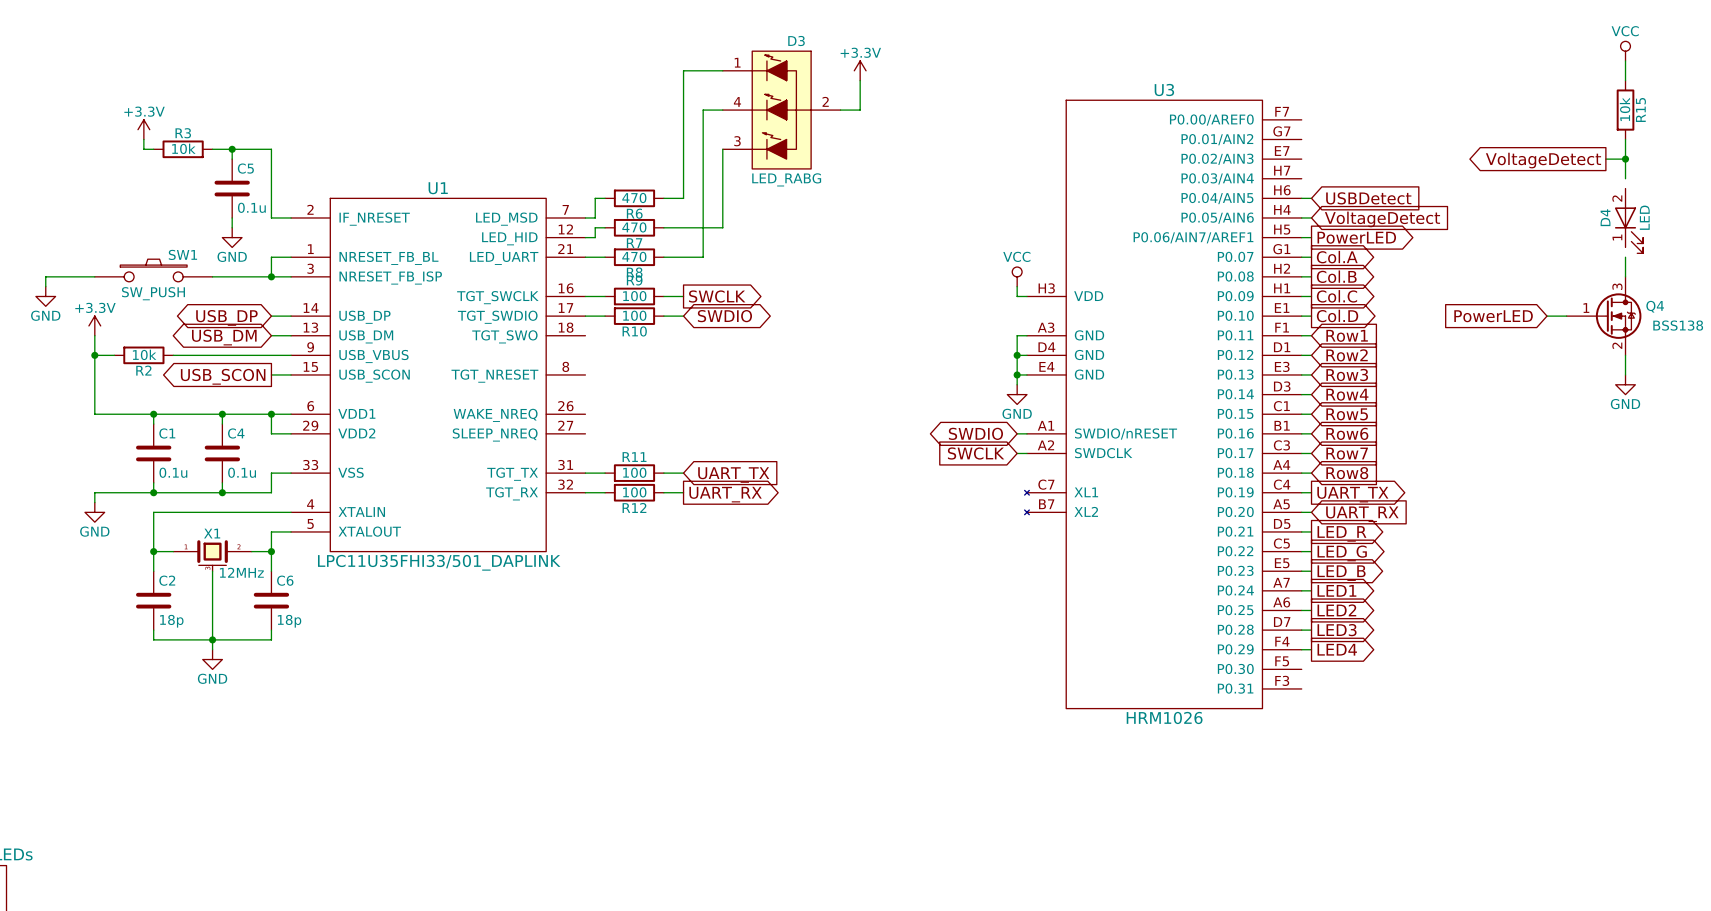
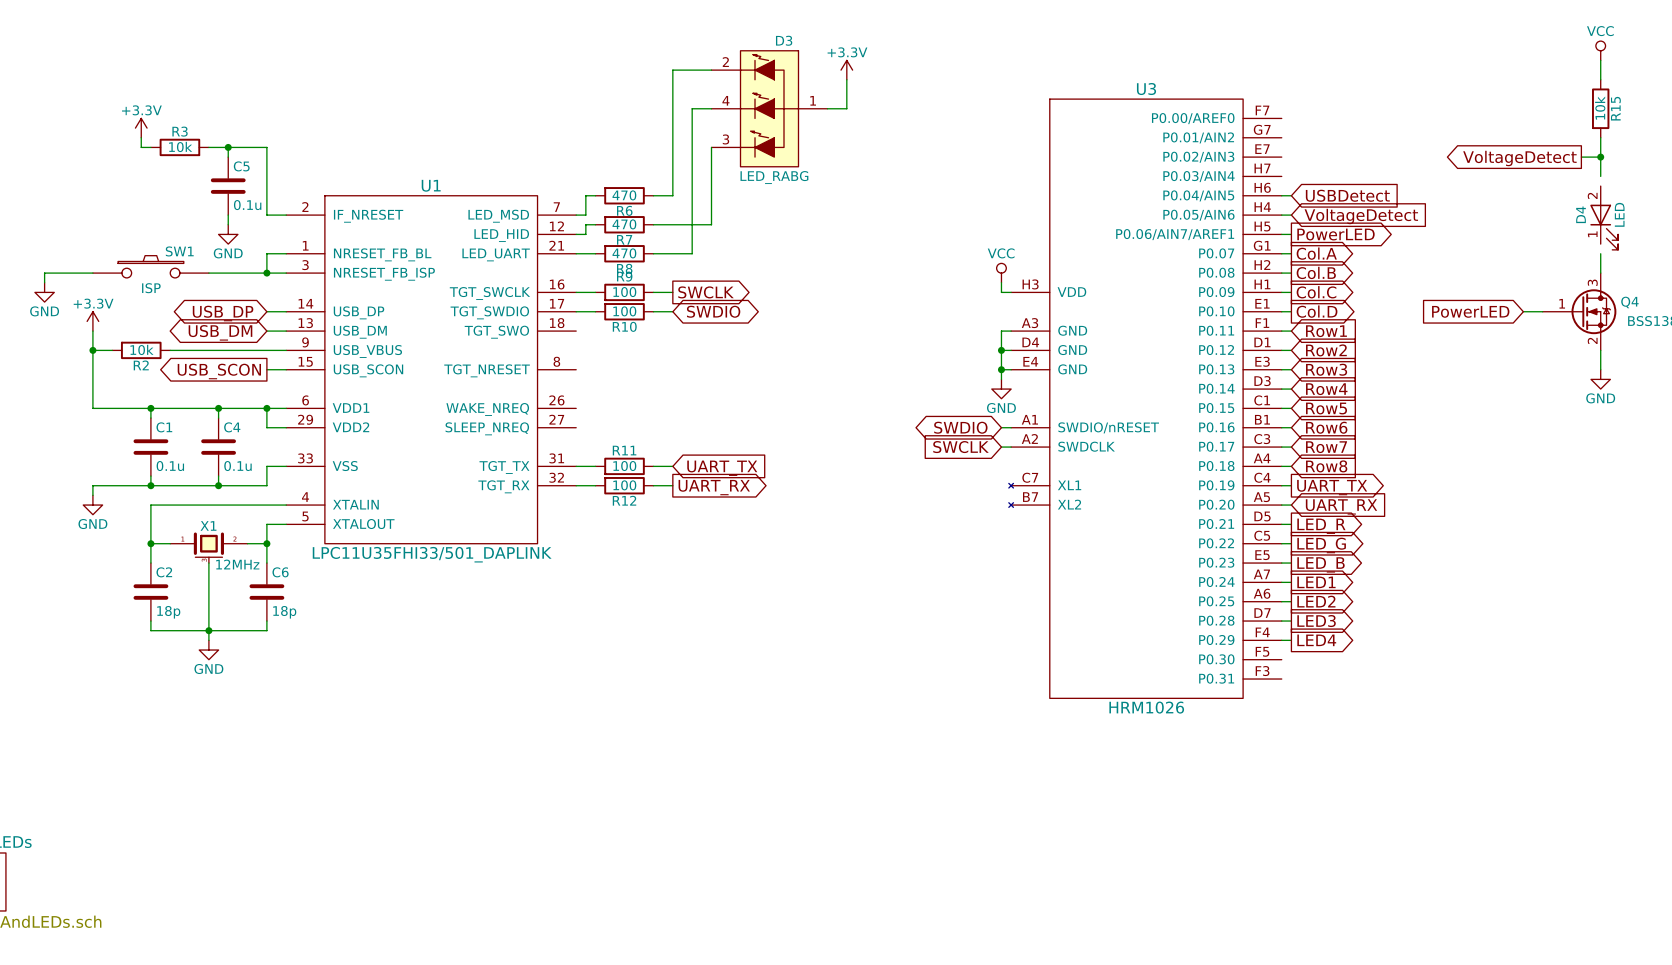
D3 pin number: 1 (737, 62) -> 2 (725, 62)
D3 pin number: 2 (825, 101) -> 1 (813, 100)
SW1 value: SW_PUSH (153, 293) -> ISP (151, 288)

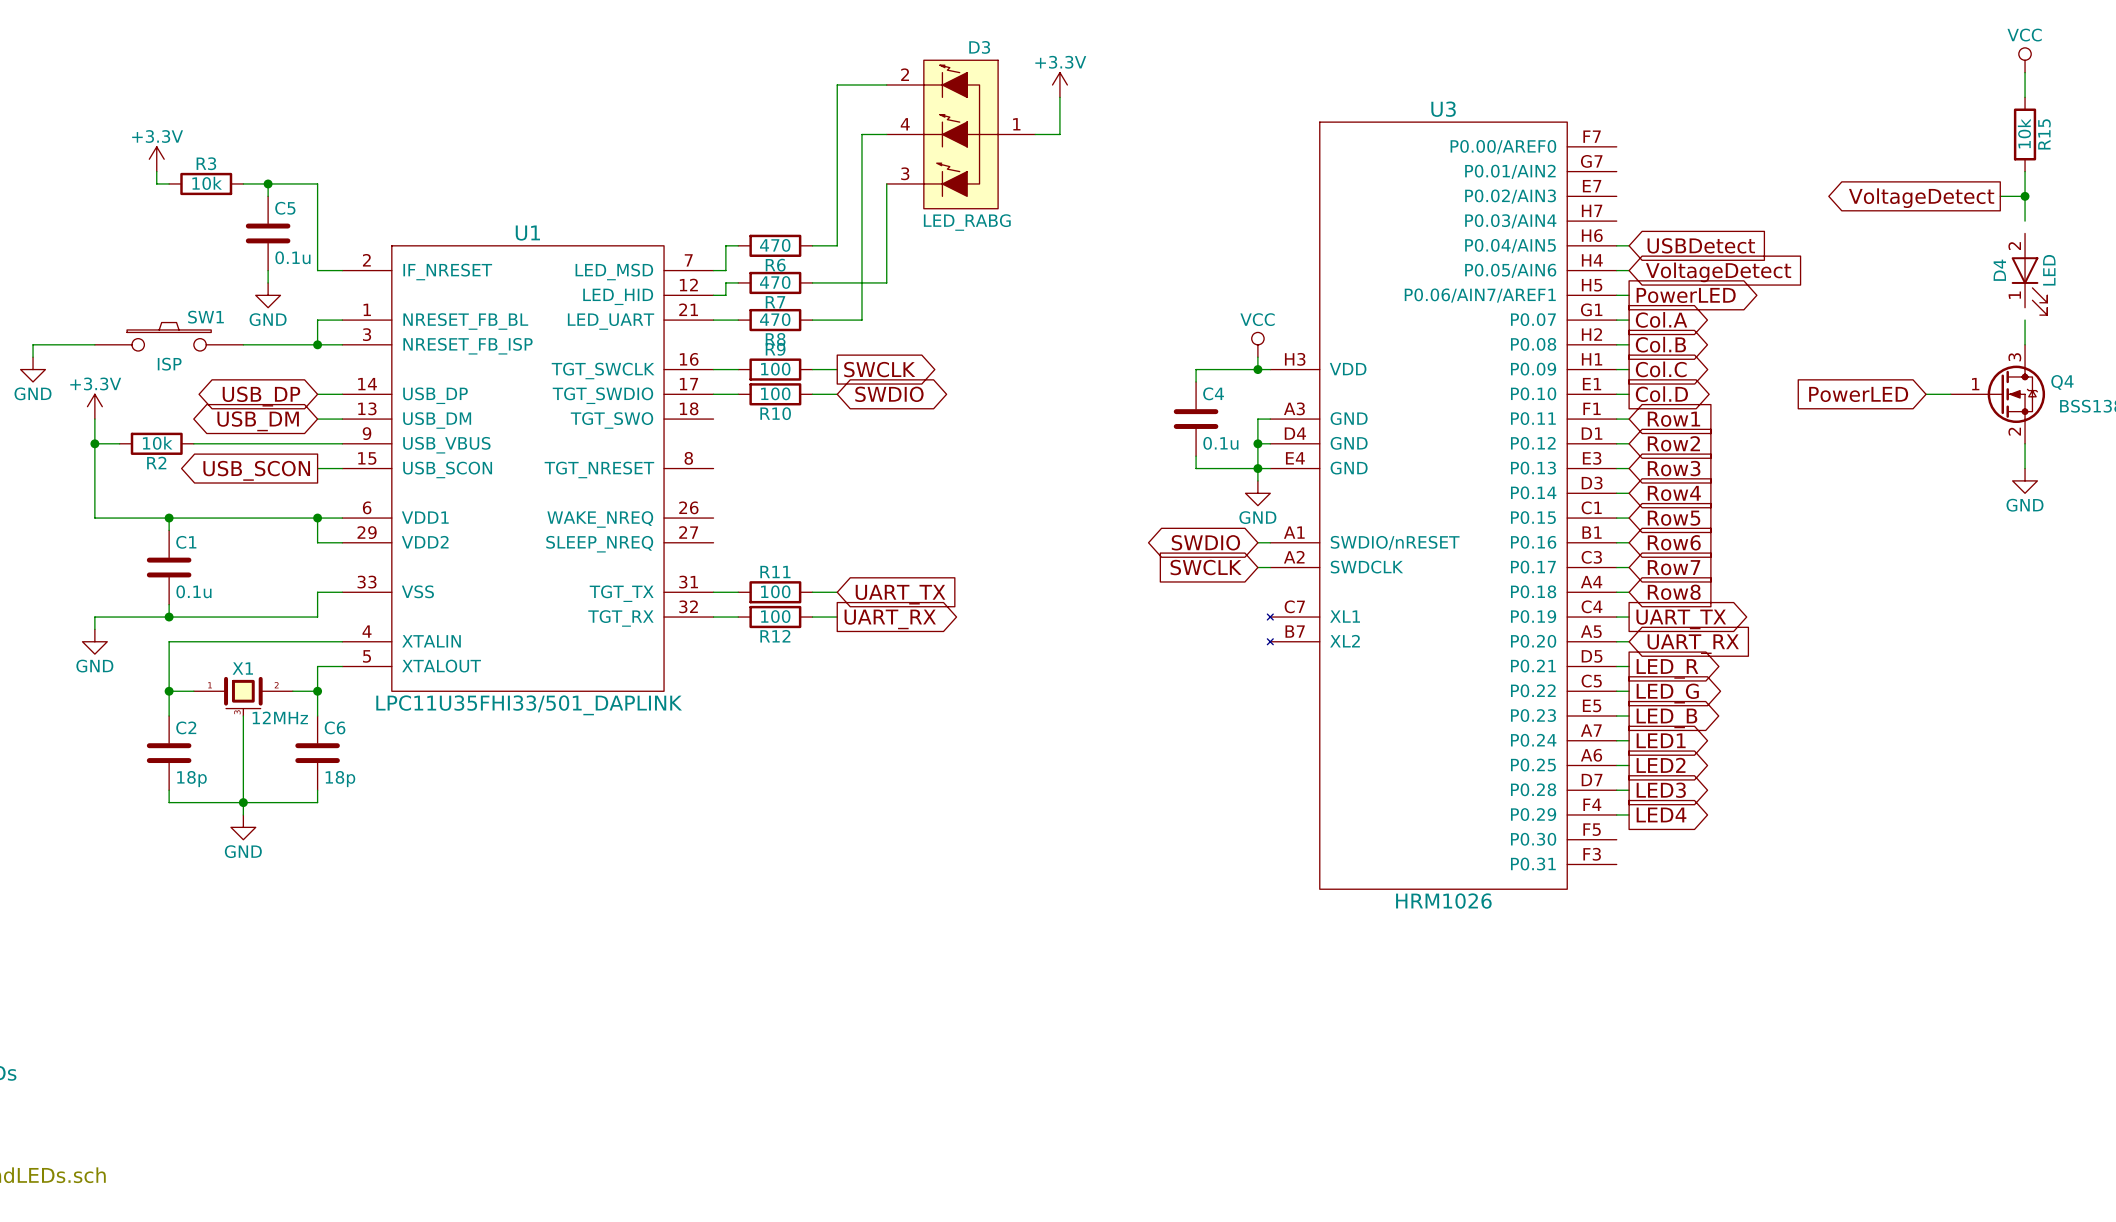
wire: none -> (1257, 369) (1196, 369) (1196, 381)
junction: none -> (1257, 369)
wire: none -> (1196, 456) (1196, 468) (1257, 468)
wire: (218, 408) (218, 418) -> none
junction: (218, 408) -> none
C4 position: (218, 447) -> (1196, 419)
wire: (218, 476) (218, 485) -> none
junction: (218, 485) -> none

